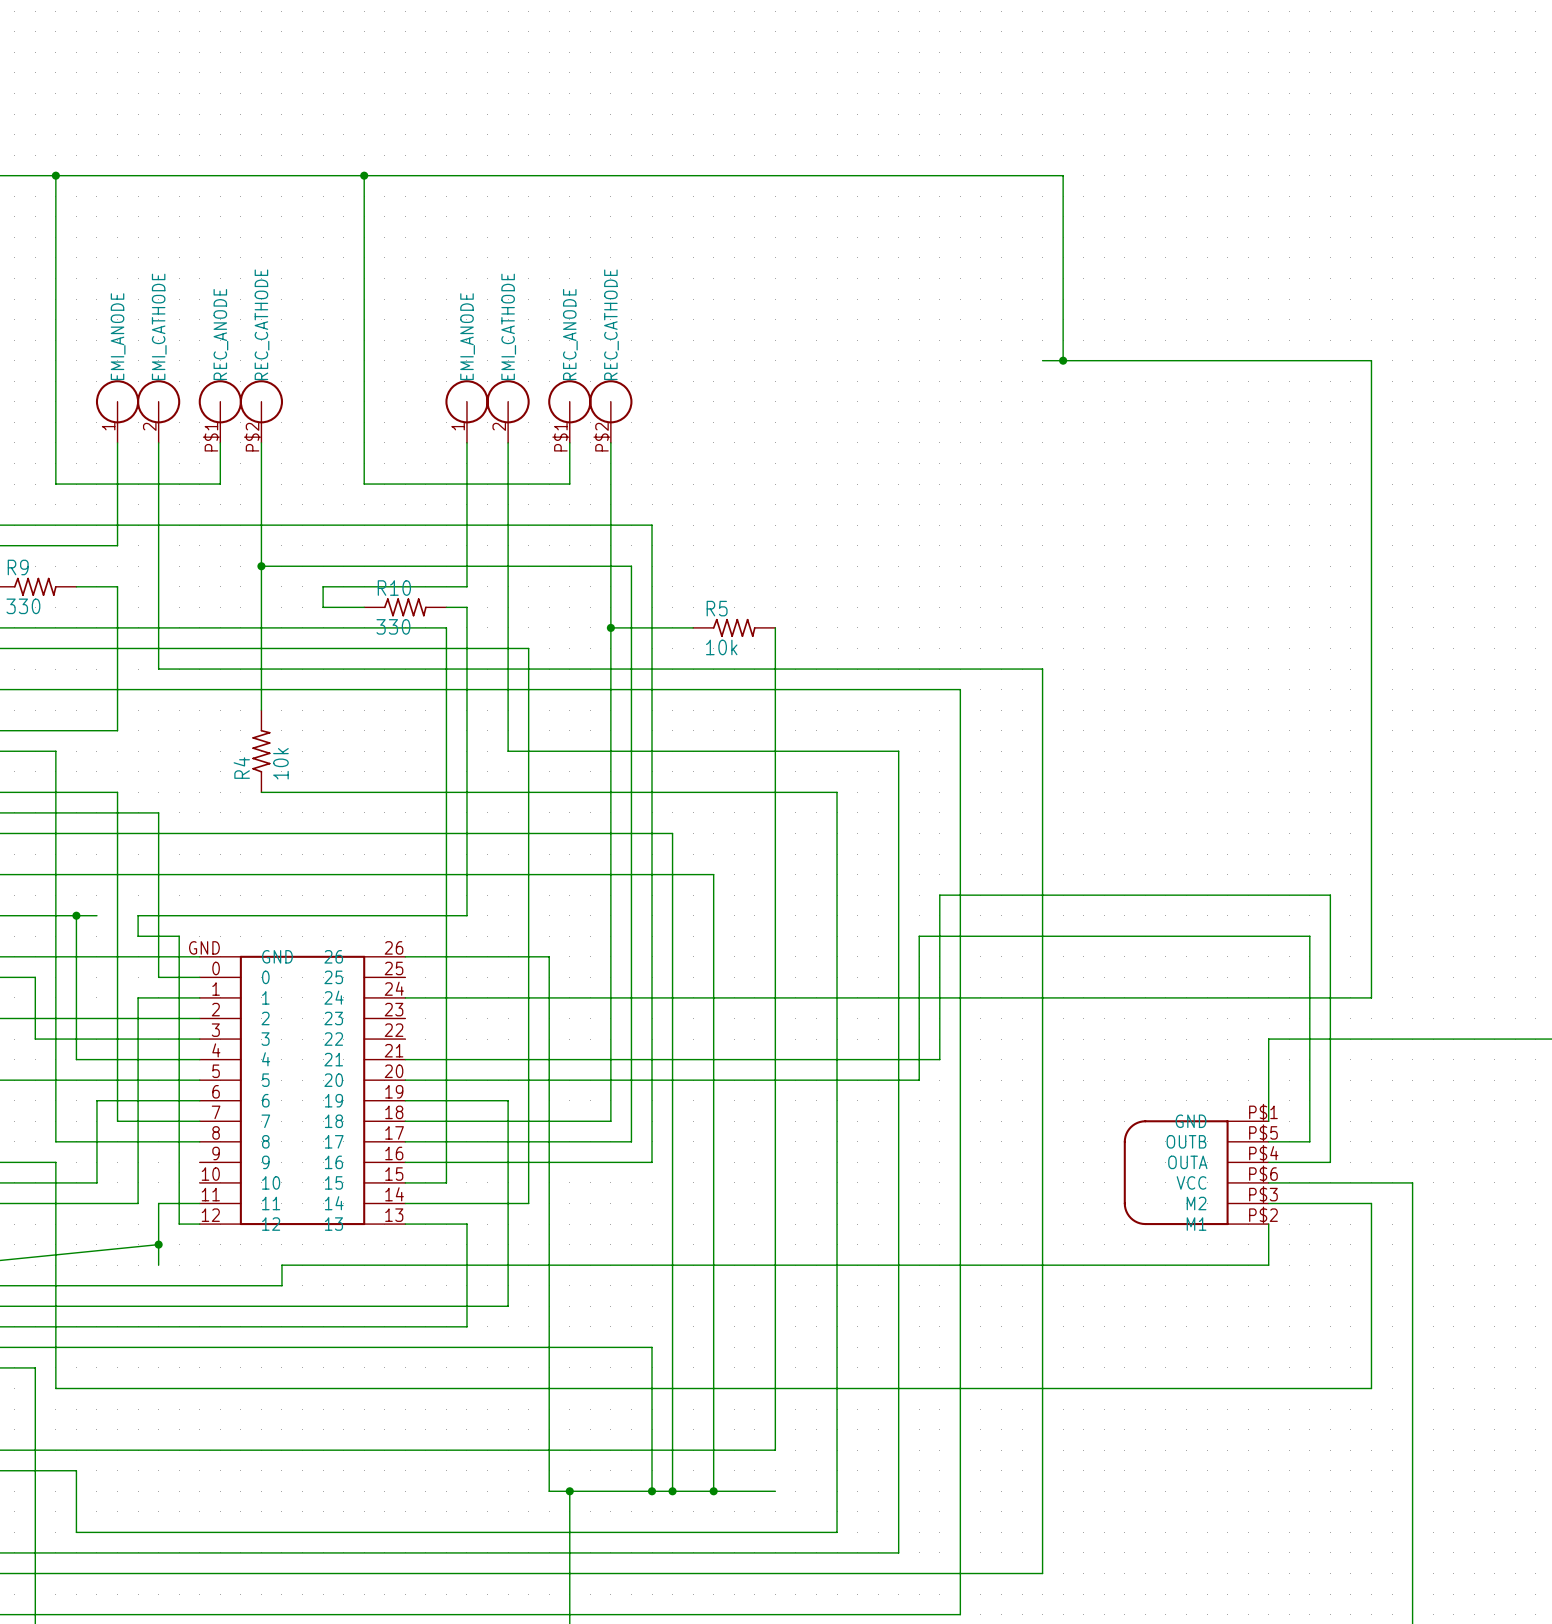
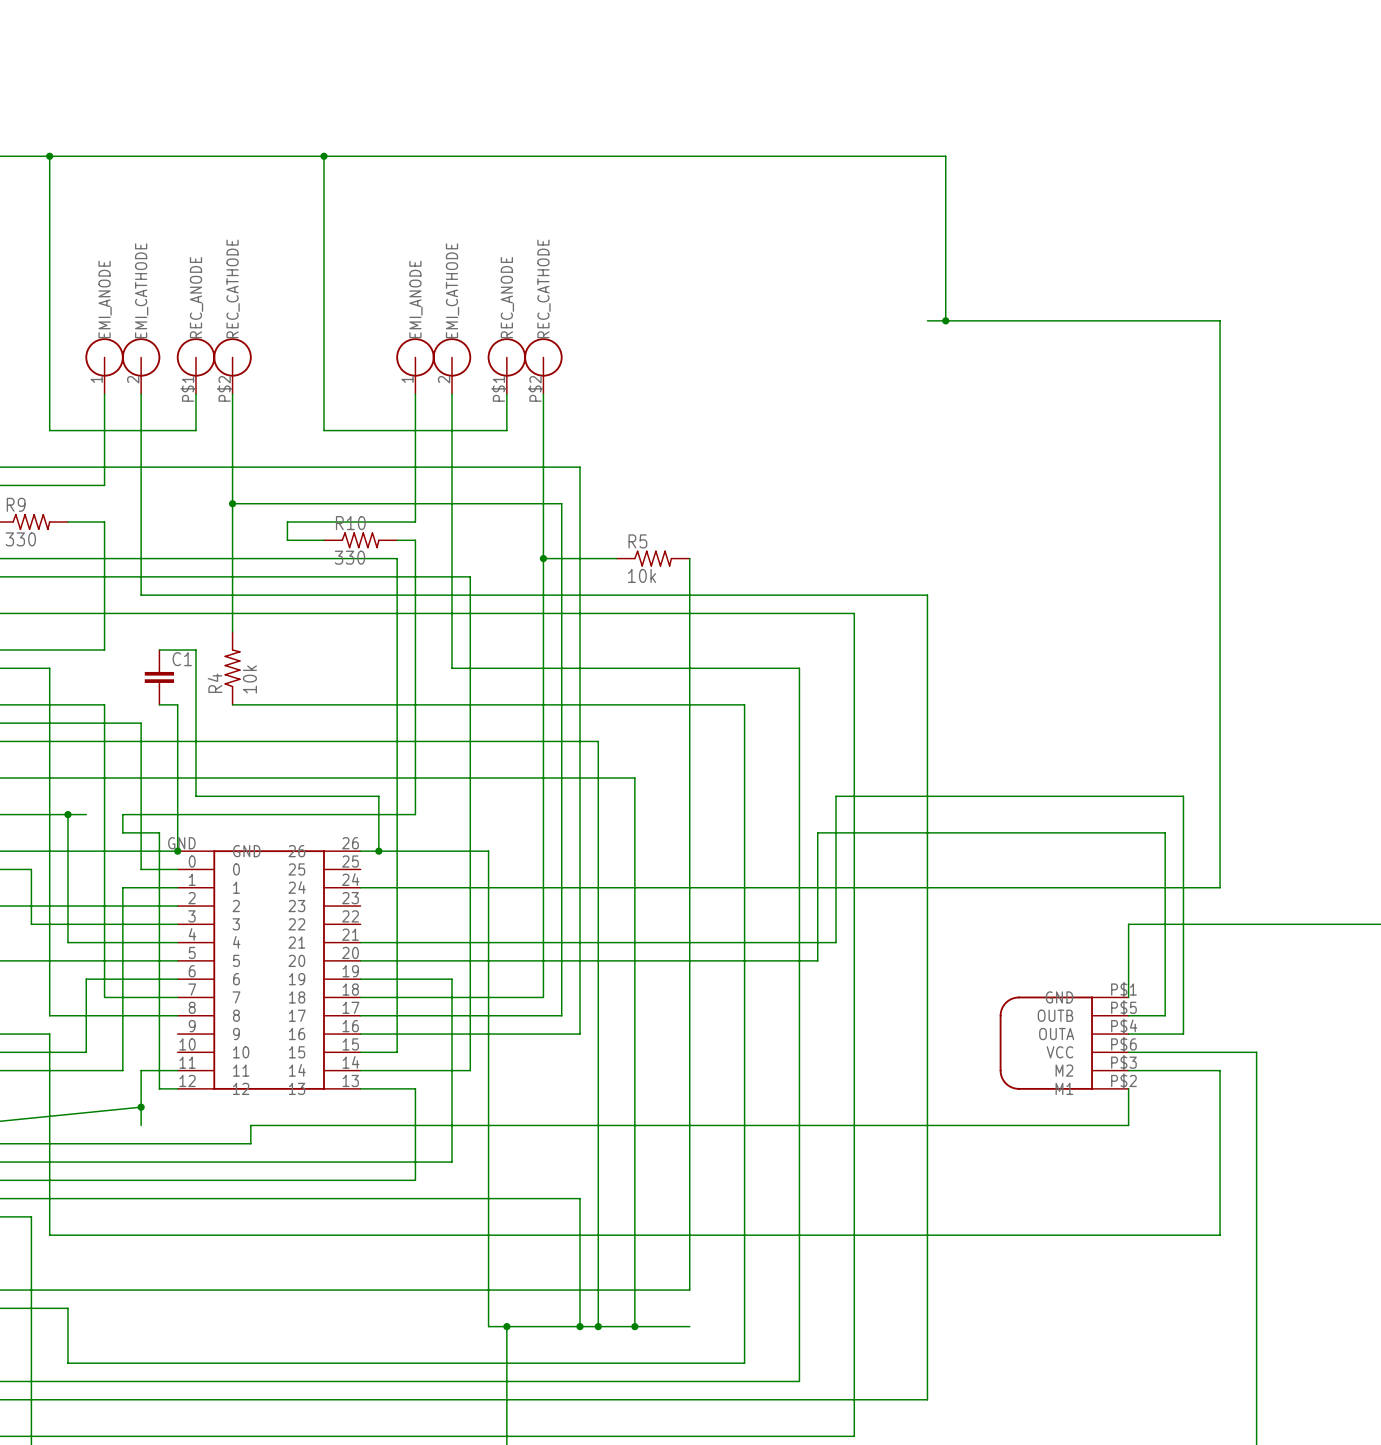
wire: none -> (159, 650) (195, 650) (195, 796) (378, 796) (378, 851)
C1: none -> (159, 677)
wire: none -> (159, 704) (177, 704) (177, 851)
junction: none -> (177, 851)
junction: none -> (378, 851)

